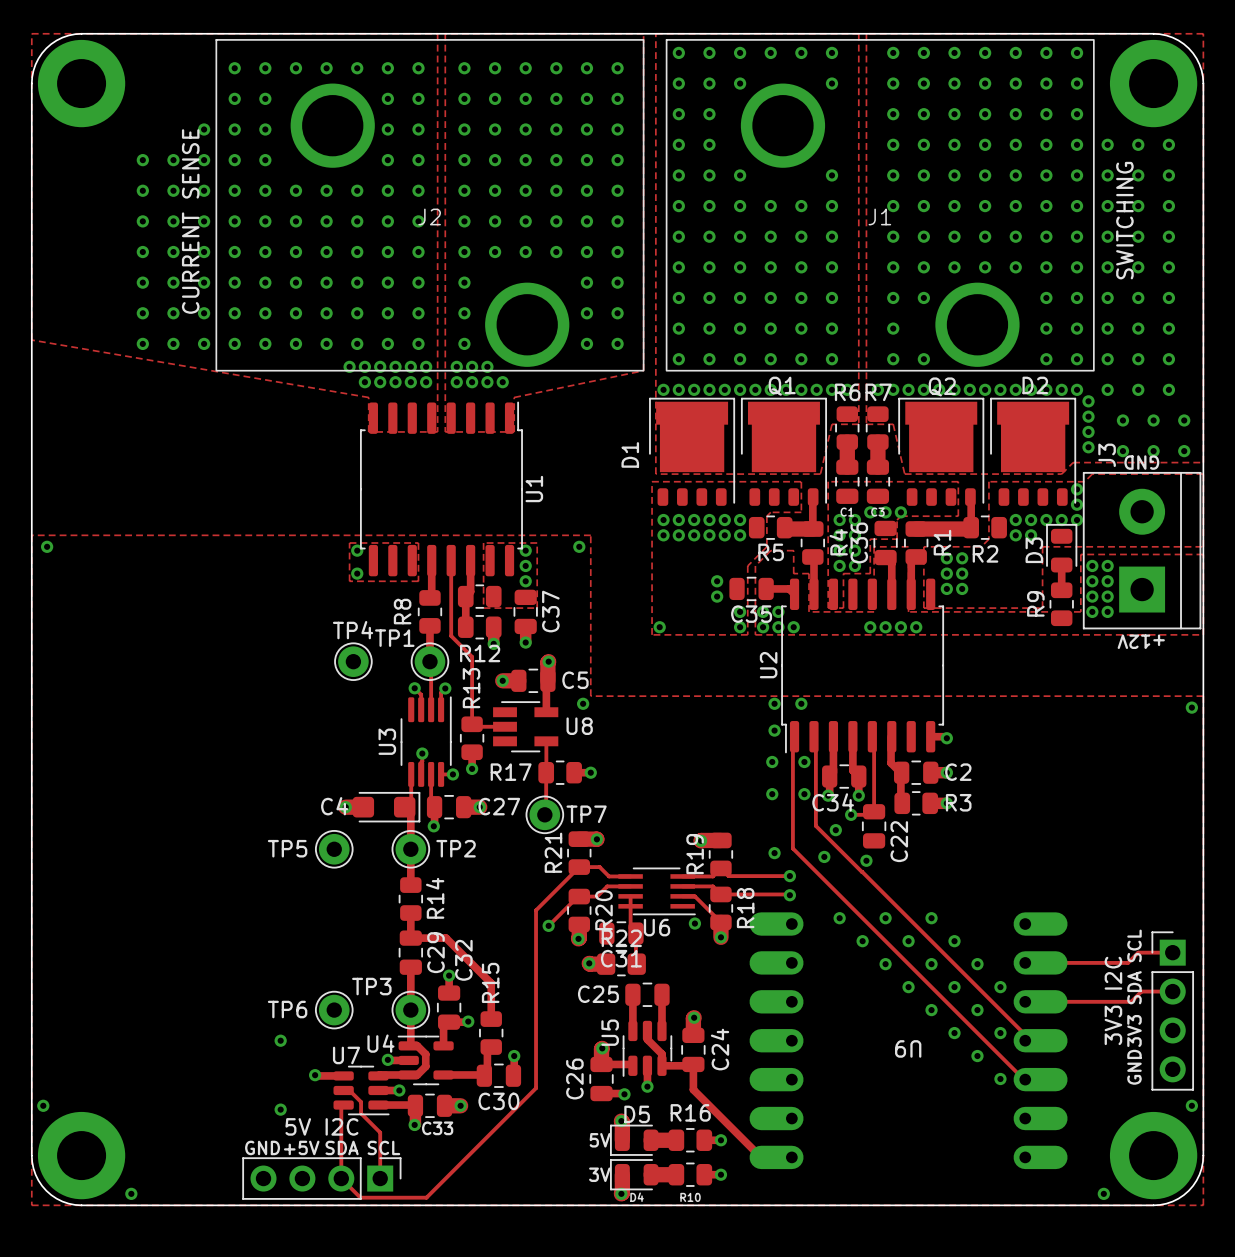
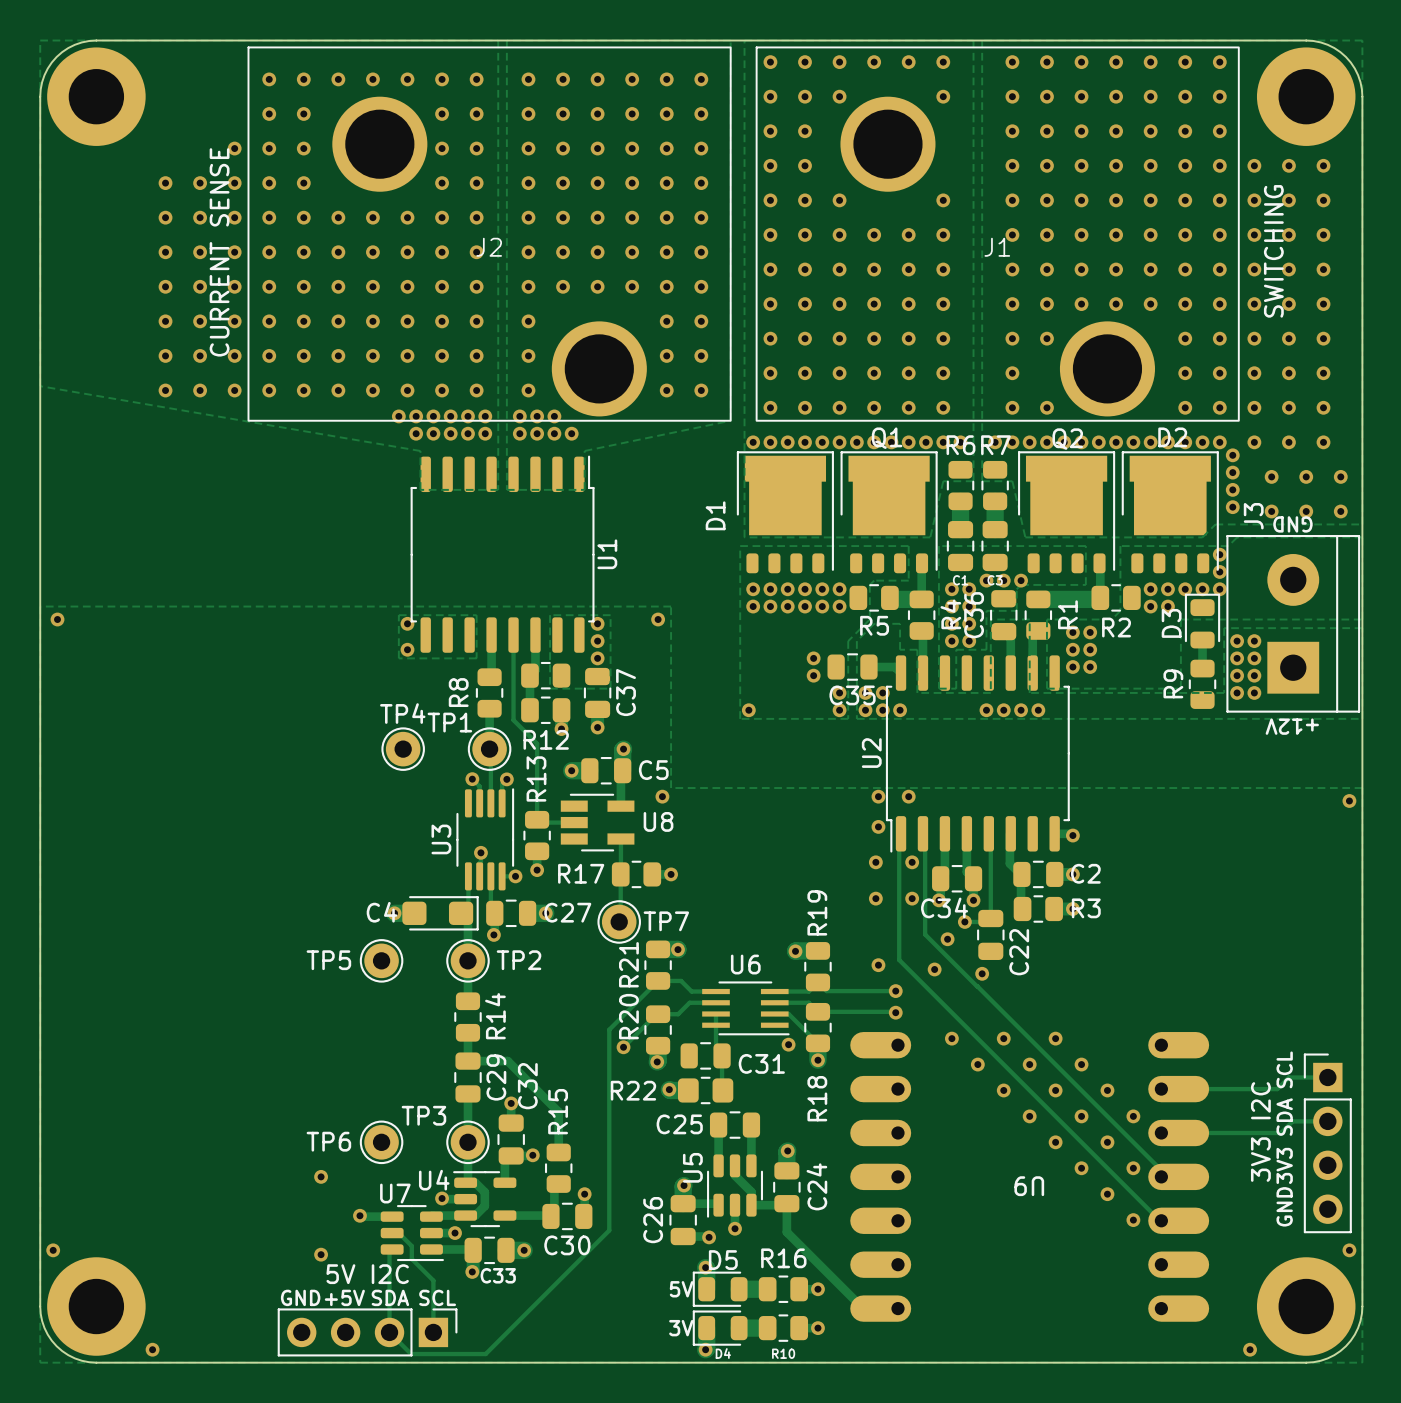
R19 name position: R19 (695, 854) -> R19 (817, 912)
R18 name position: R18 (745, 908) -> R18 (817, 1098)
R20 name position: R20 (603, 910) -> R20 (628, 1016)
U6 name position: U6 (657, 927) -> U6 (745, 964)
R22 name position: R22 (621, 938) -> R22 (633, 1090)
C31 name position: C31 (621, 958) -> C31 (761, 1063)

